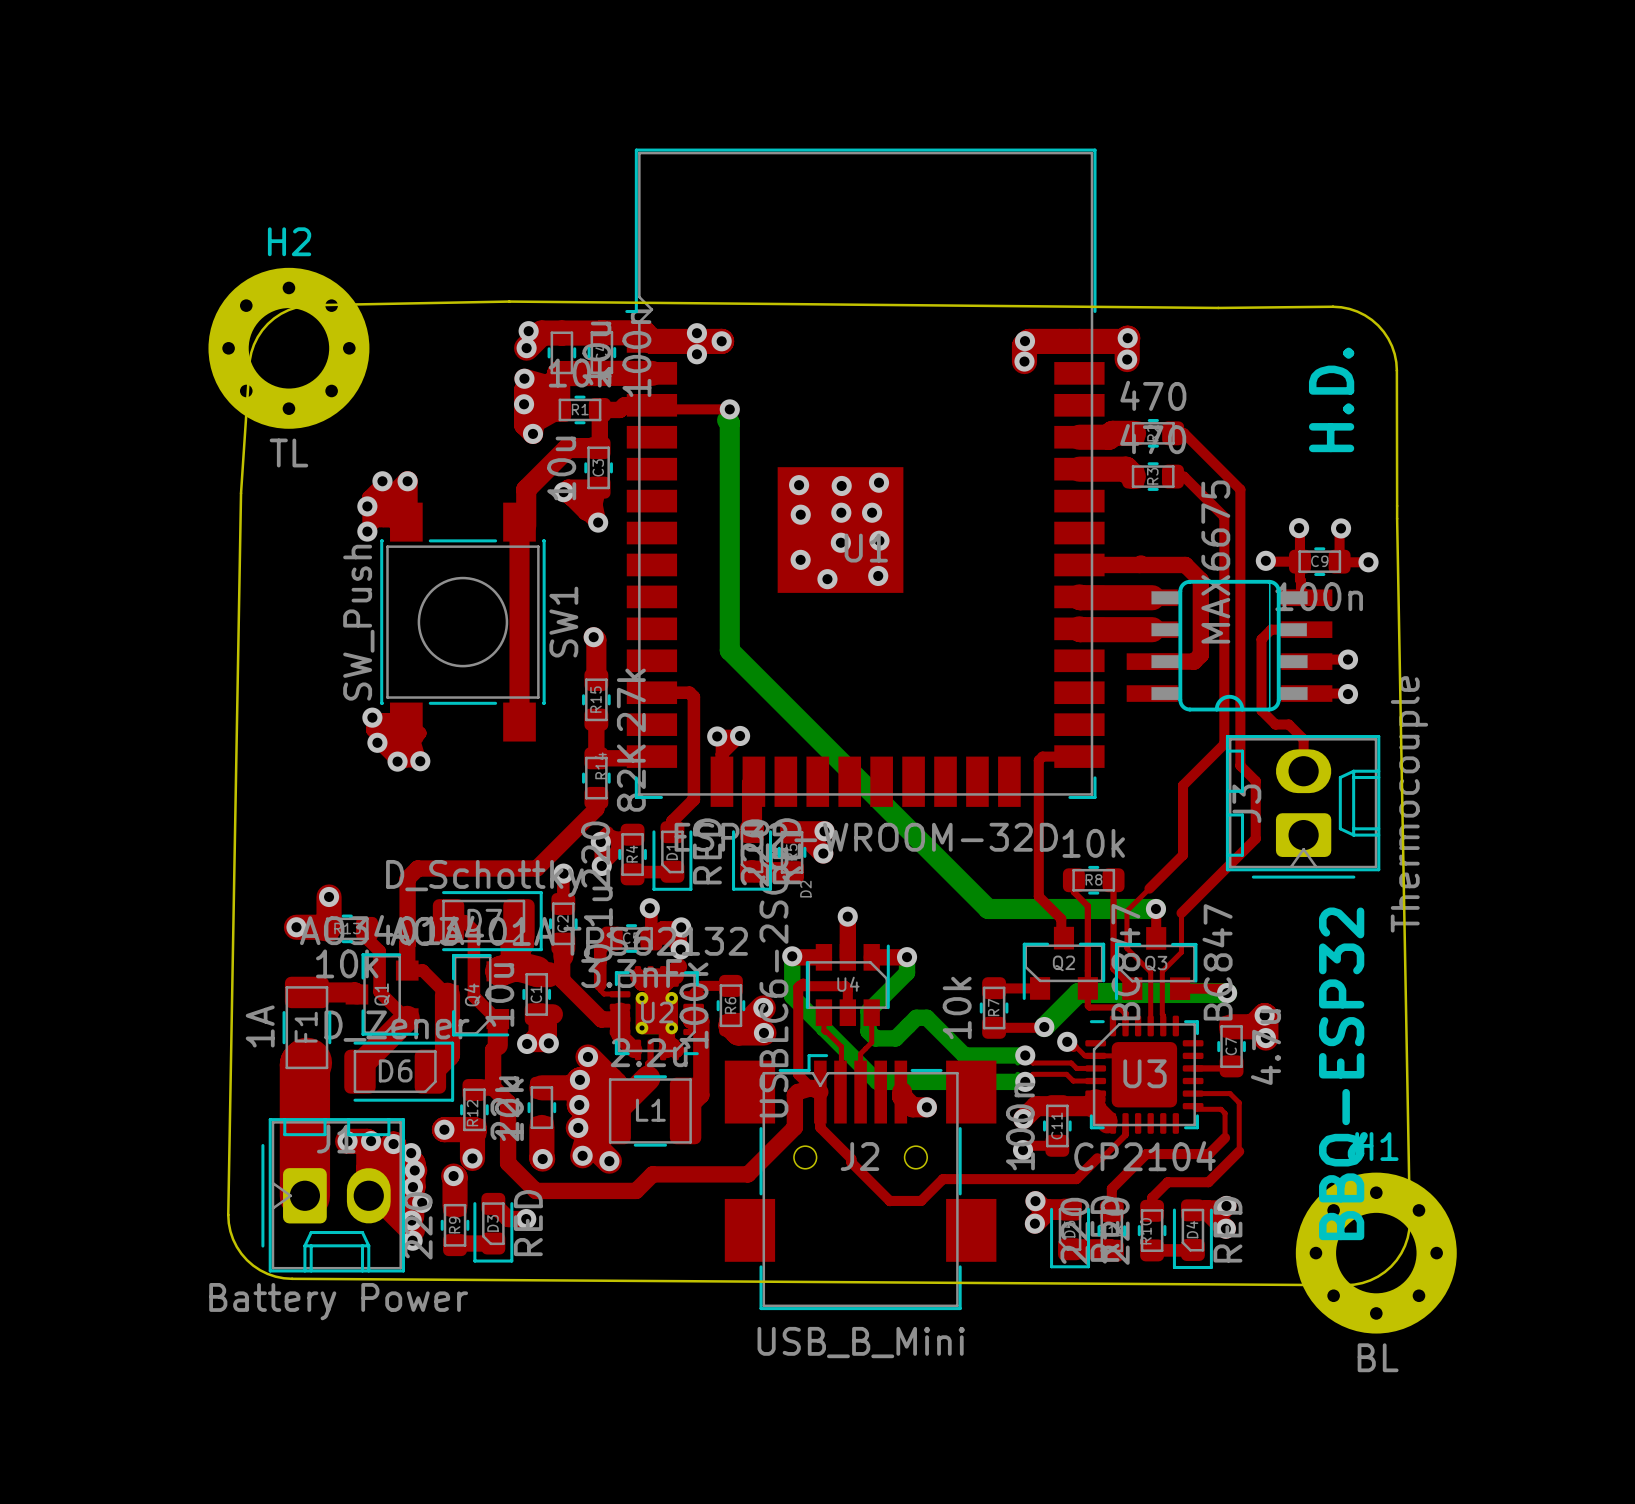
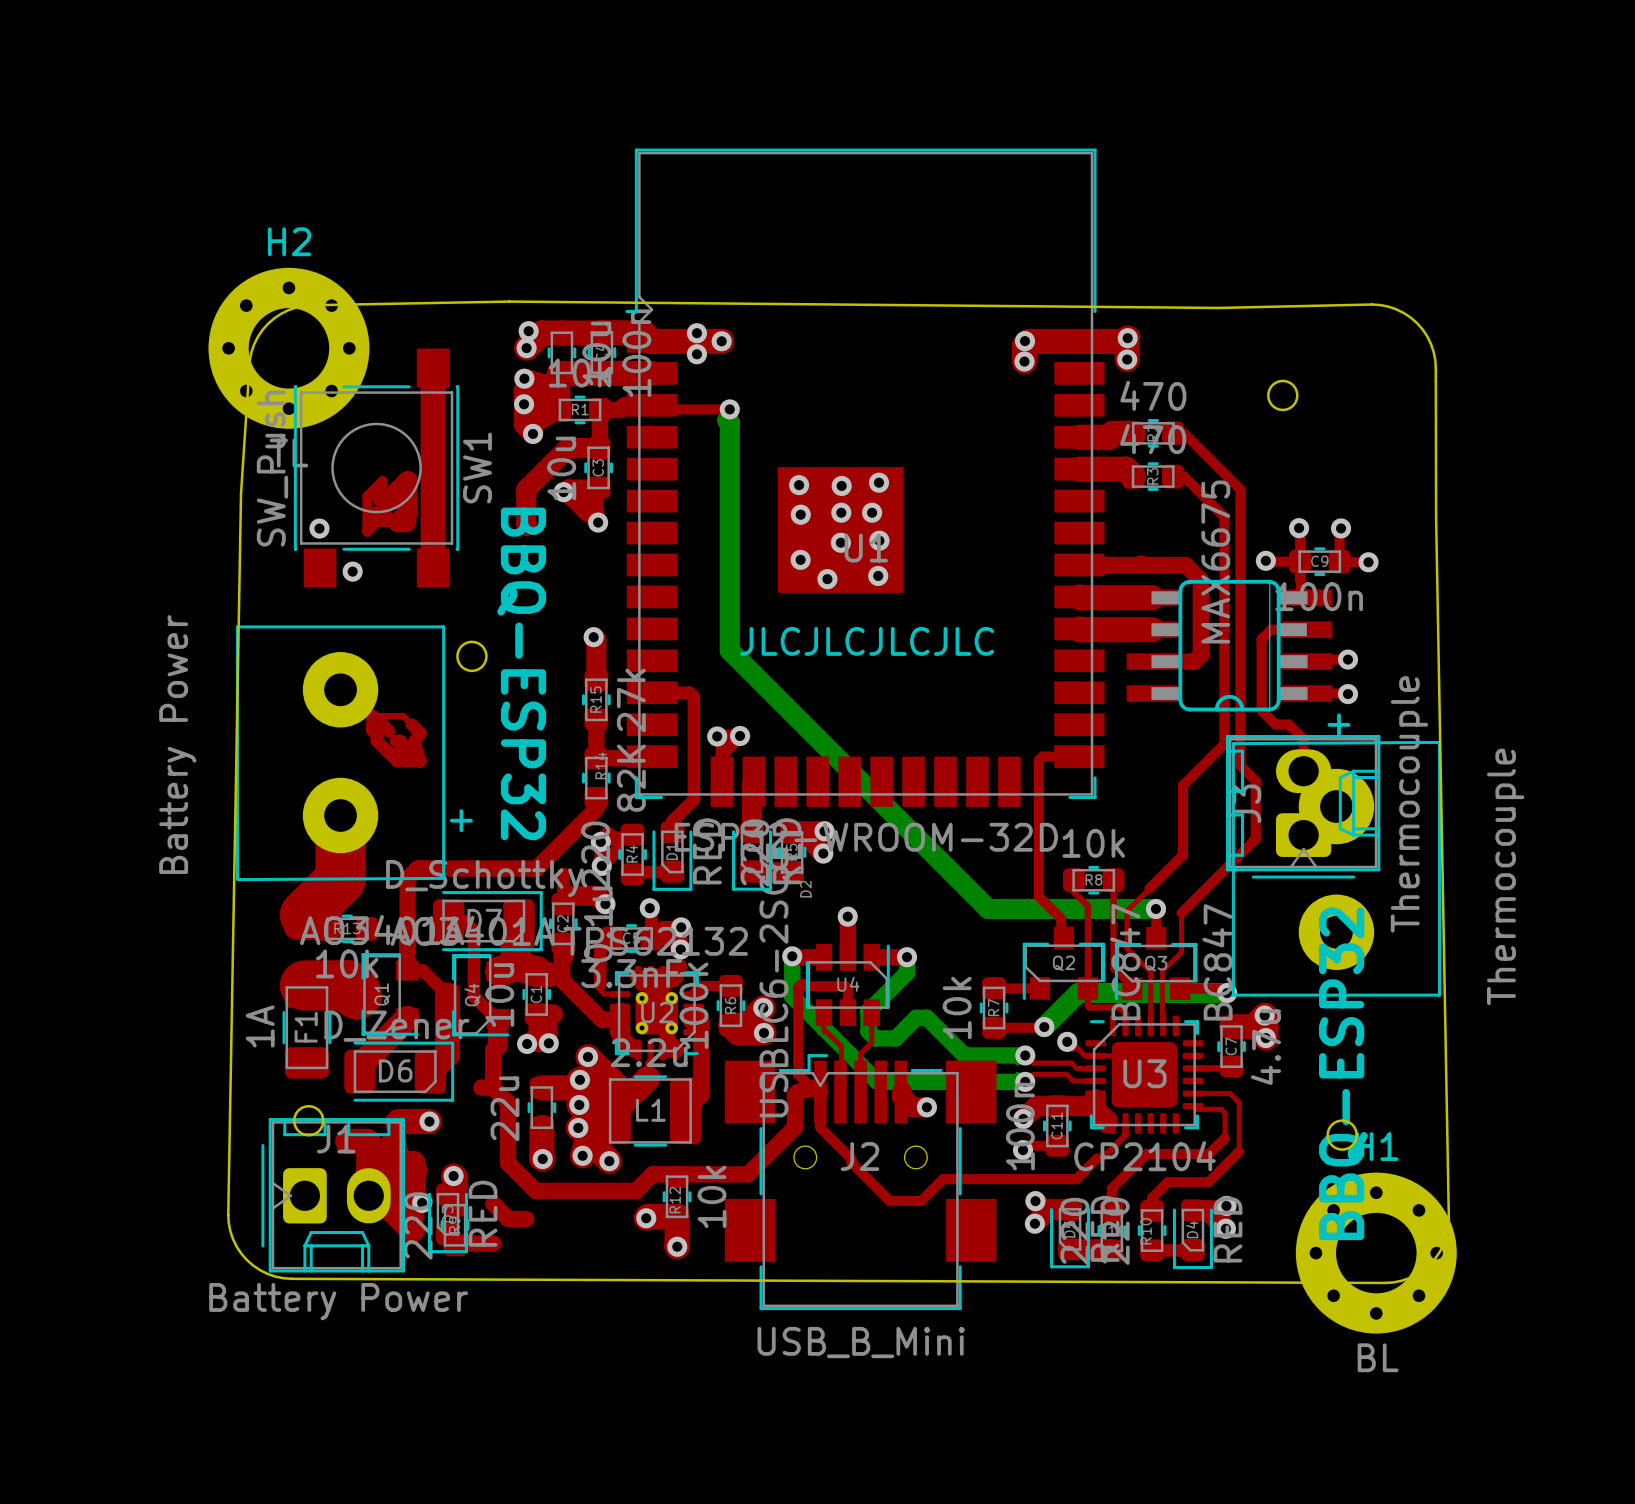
board edge: (1218, 307) (1333, 306) (1349, 308) (1364, 315) (1383, 331) (1392, 346) (1396, 362) (1397, 518) (1409, 1221) (1405, 1245) (1391, 1266) (1370, 1280) (1346, 1285) (292, 1278) -> (1218, 307) (1371, 304) (1388, 306) (1403, 313) (1417, 323) (1427, 336) (1433, 351) (1435, 368) (1436, 516) (1448, 1219) (1444, 1243) (1430, 1264) (1409, 1278) (1384, 1282) (292, 1278)
round board edge: none -> [1267, 379, 1299, 412]
text: H.D. (1331, 399) -> none
via: (382, 481) -> none
via: (407, 481) -> none
via: (367, 506) -> none
top track: (519, 522) (519, 722) -> (433, 368) (433, 567)
via: none -> (319, 528)
via: (367, 531) -> none
via: none -> (352, 571)
SW1 position: (462, 622) -> (376, 468)
round board edge: none -> [456, 640, 488, 673]
text: none -> JLCJLCJLCJLC (867, 641)
text: none -> BBQ-ESP32 (521, 673)
via: (372, 717) -> none
text: none -> + (1339, 724)
via: (377, 742) -> none
part: none -> Battery Power (340, 753)
via: (397, 761) -> none
via: (420, 761) -> none
top track: none -> (340, 815) (340, 879) (304, 915)
text: none -> + (461, 820)
part: none -> Thermocouple (1336, 868)
via position: (563, 873) -> (605, 904)
top track: none -> (571, 895) (597, 895) (605, 904)
via: (329, 896) -> none
via: (296, 927) -> none
top track: (368, 927) (368, 939) (379, 951) (379, 991) (405, 1018) -> none
top track: none -> (304, 985) (347, 985) (356, 994)
top track: (306, 1062) (304, 1064) (304, 1195) -> none
round board edge: none -> [293, 1104, 325, 1137]
R12 position: (474, 1109) -> (677, 1196)
round board edge: none -> [1326, 1119, 1358, 1151]
top track: none -> (429, 1121) (397, 1122)
top track: (444, 1129) (474, 1129) (472, 1131) (472, 1158) -> none
via position: (444, 1129) -> (429, 1121)
via: (347, 1141) -> none
via: (371, 1141) -> none
via: (393, 1144) -> none
via: (411, 1153) -> none
via: (472, 1158) -> none
via: (414, 1170) -> none
via: (412, 1187) -> none
top track: none -> (646, 1218) (647, 1216) (677, 1216) (677, 1246)
via: none -> (646, 1218)
via: (526, 1219) -> none
via: (411, 1220) -> none
D3 position: (493, 1227) -> (447, 1218)
via: (412, 1240) -> none
via: none -> (677, 1246)

